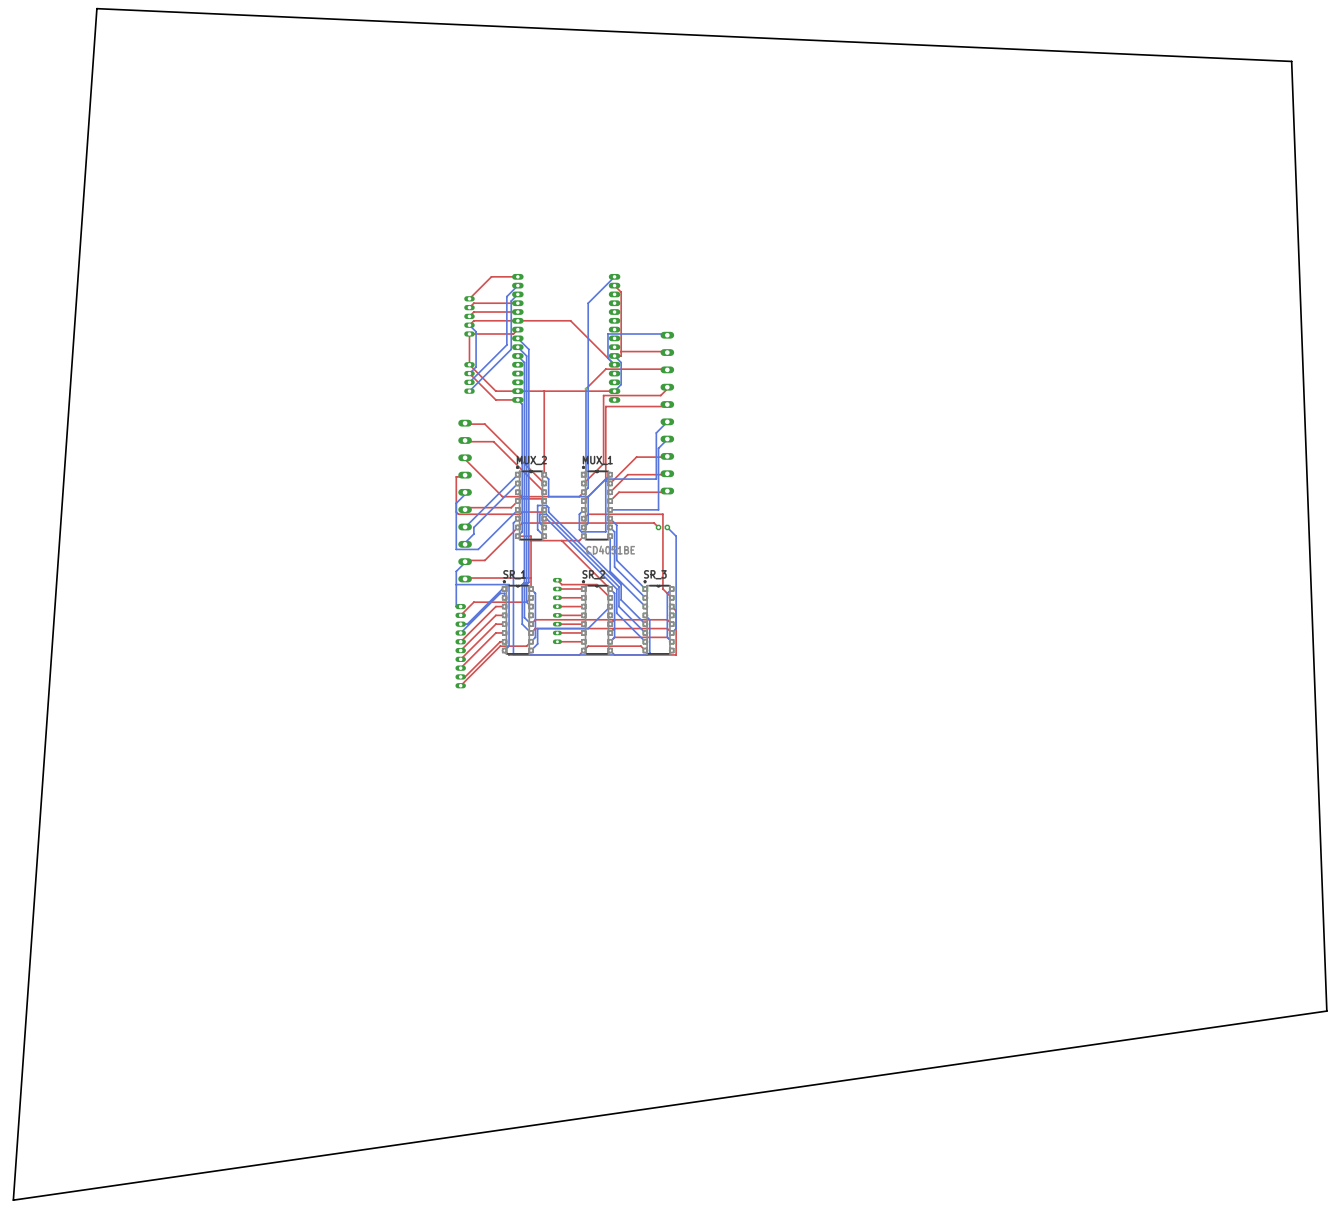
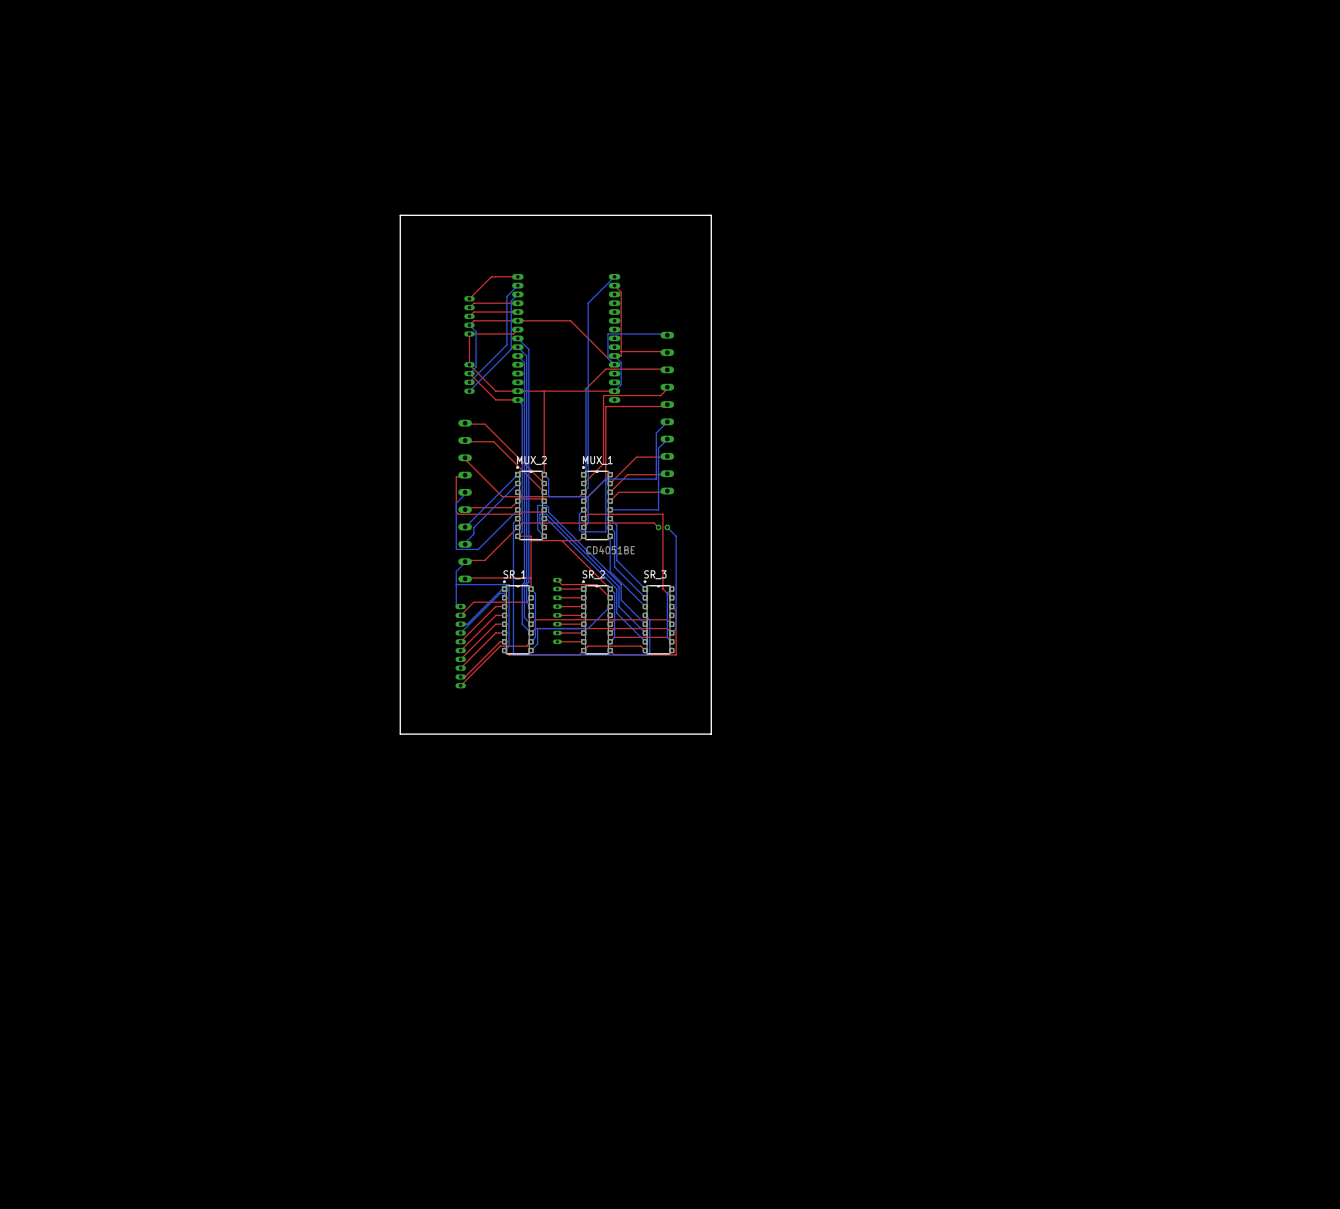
board edge: (96, 8) (13, 1200) (1326, 1011) (1291, 61) (96, 8) -> none
board edge: none -> (711, 215) (400, 215) (400, 734) (711, 734) (711, 215)

